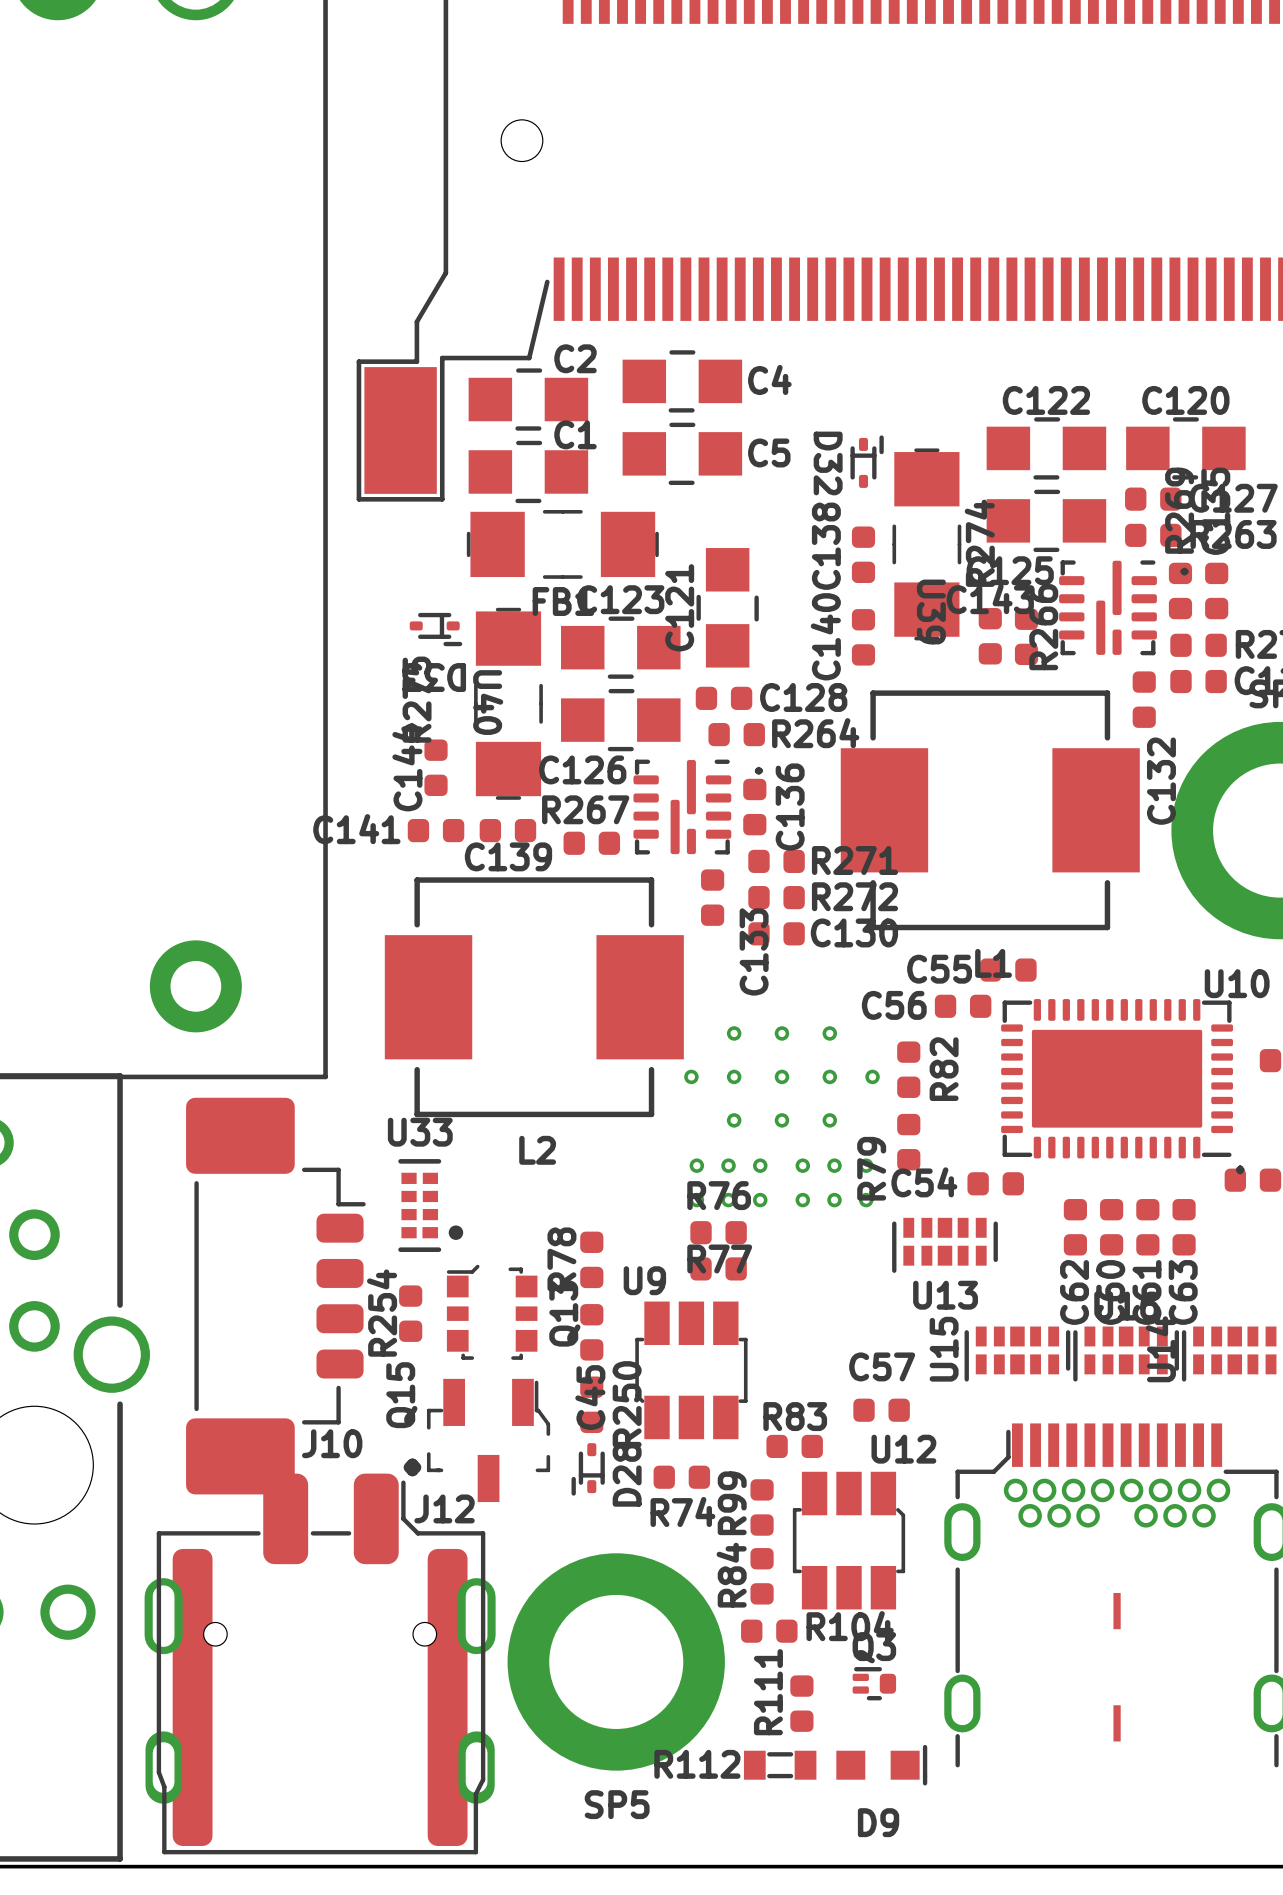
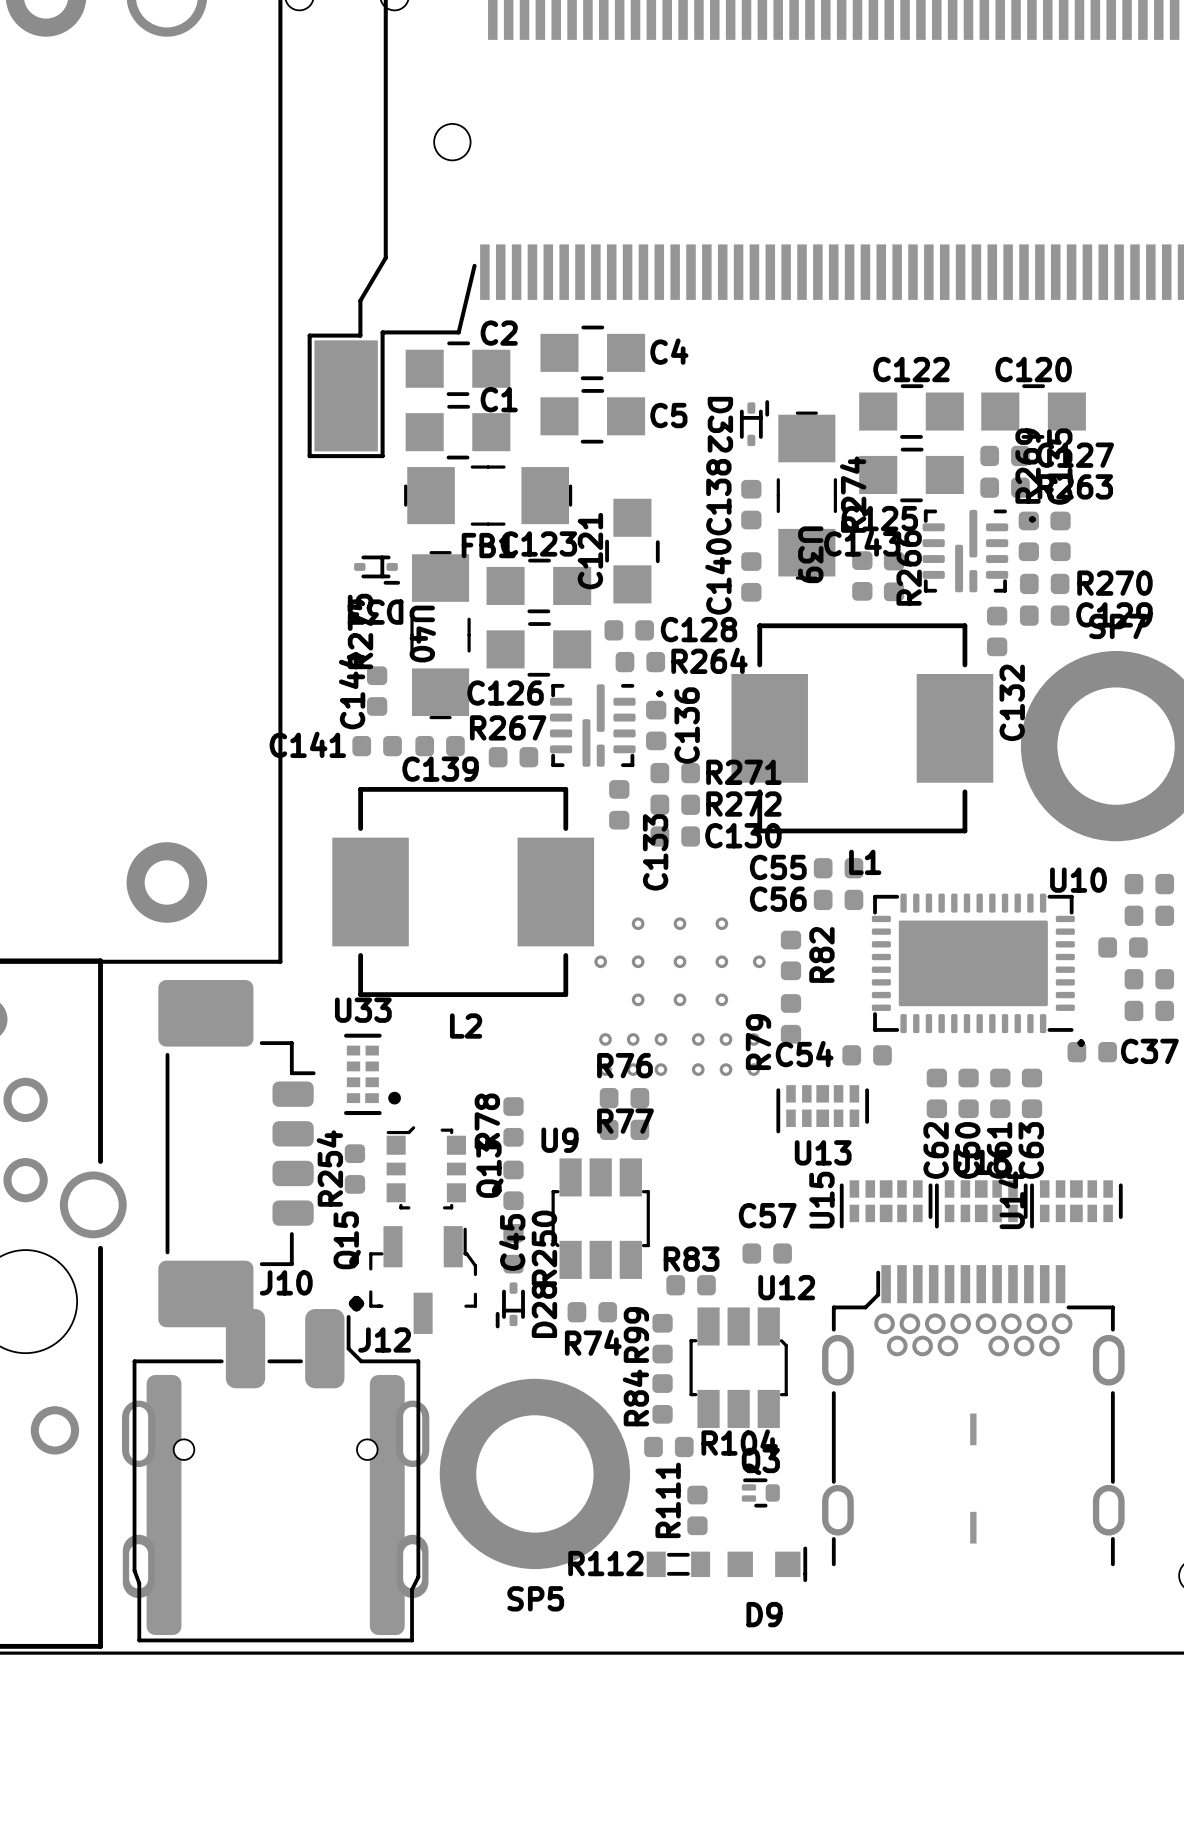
C55 position: (1008, 970) -> (838, 868)

